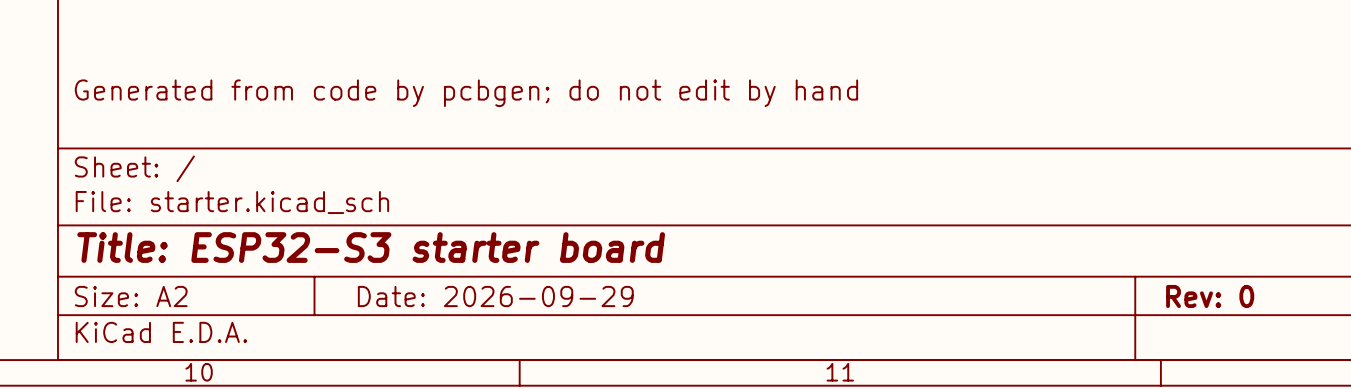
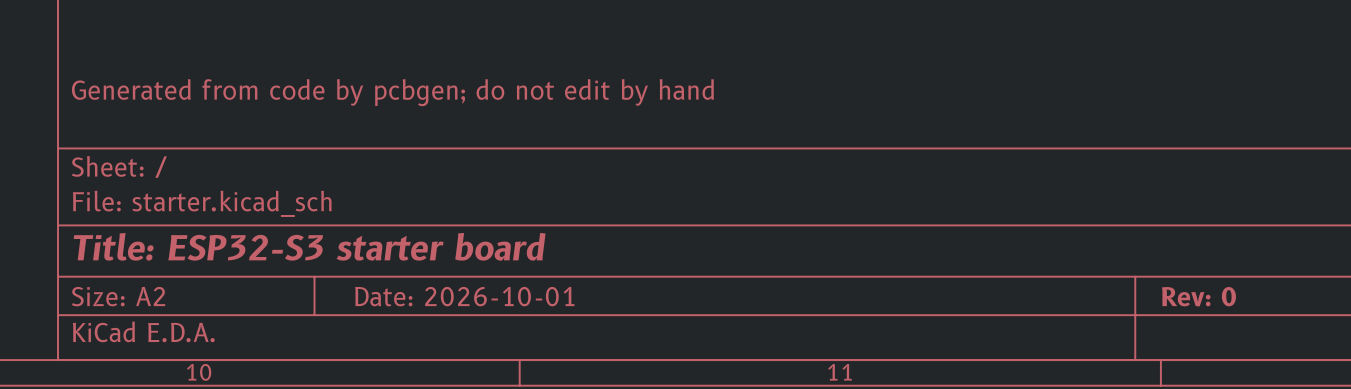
title block: Date: 2026-09-29 (495, 296) -> Date: 2026-10-01 (464, 296)

